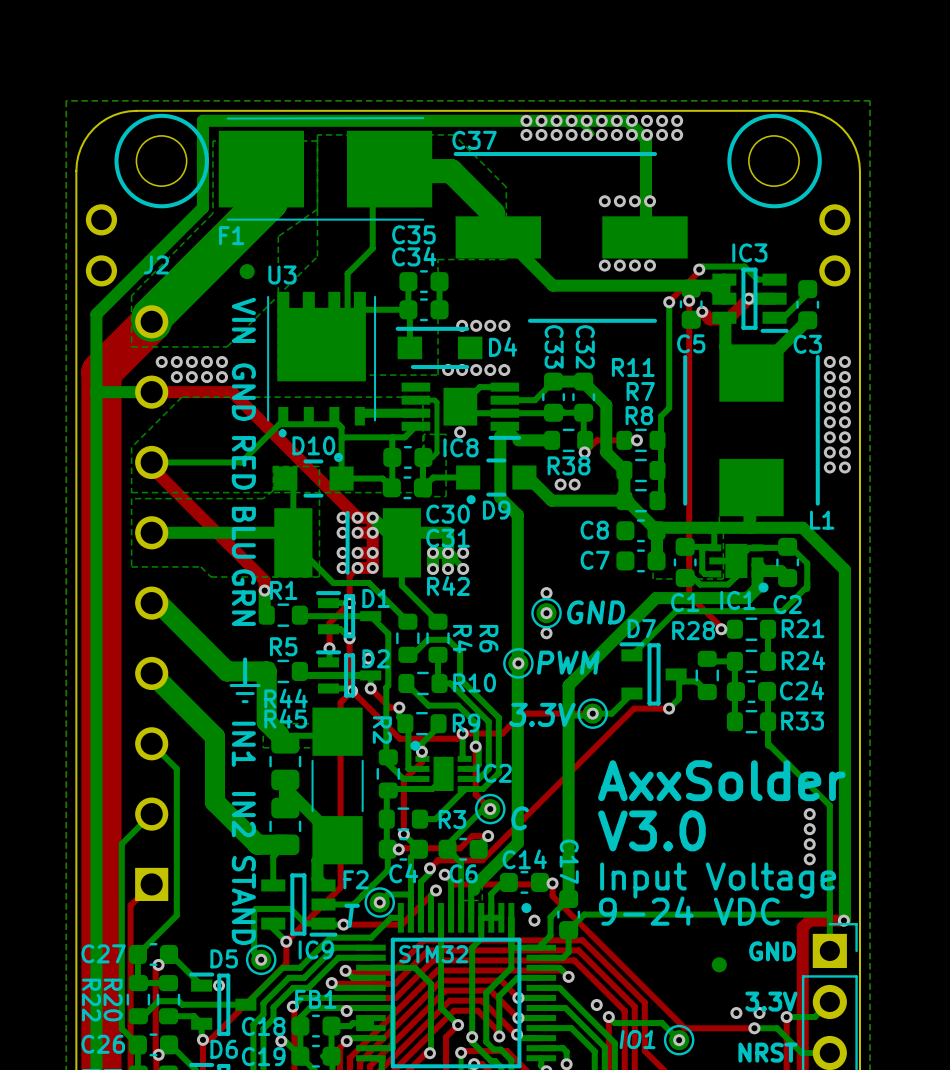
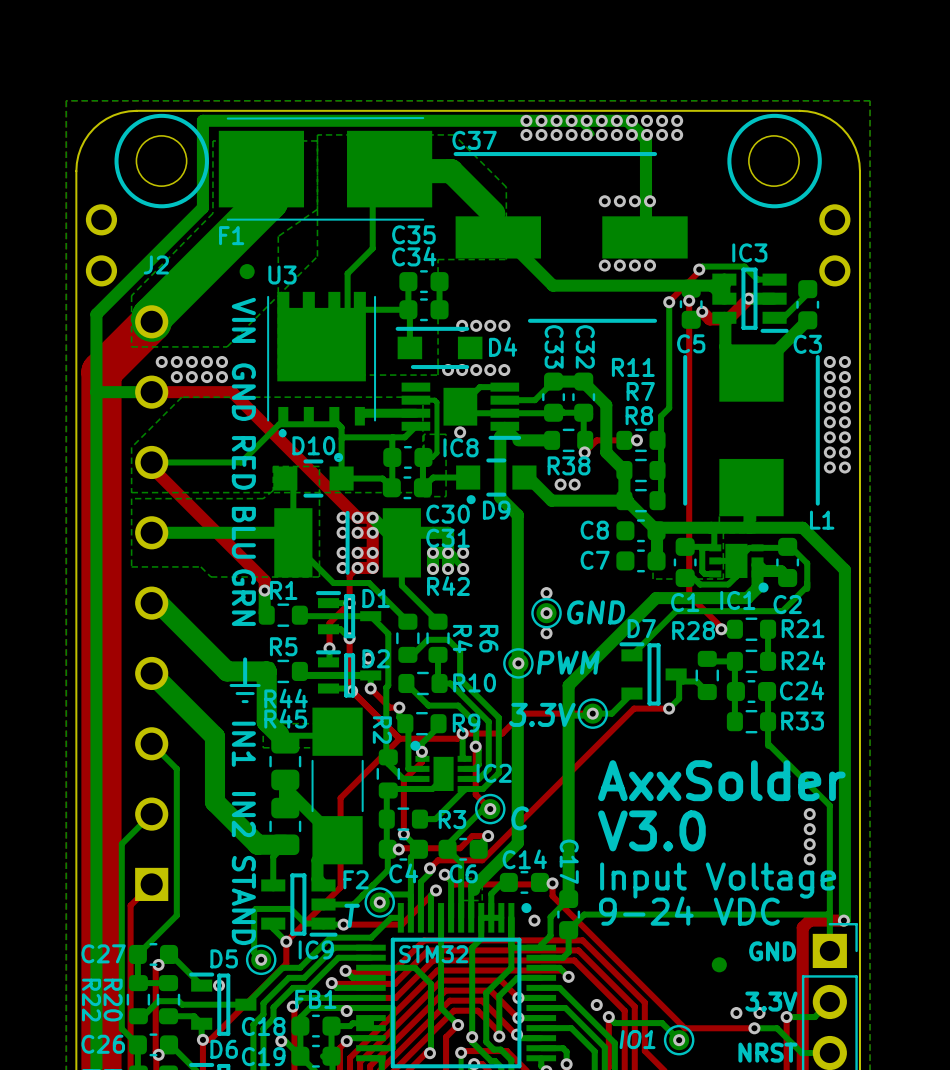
top track: (352, 691) (340, 702) (340, 798) -> (349, 688) (399, 738) (340, 798)

